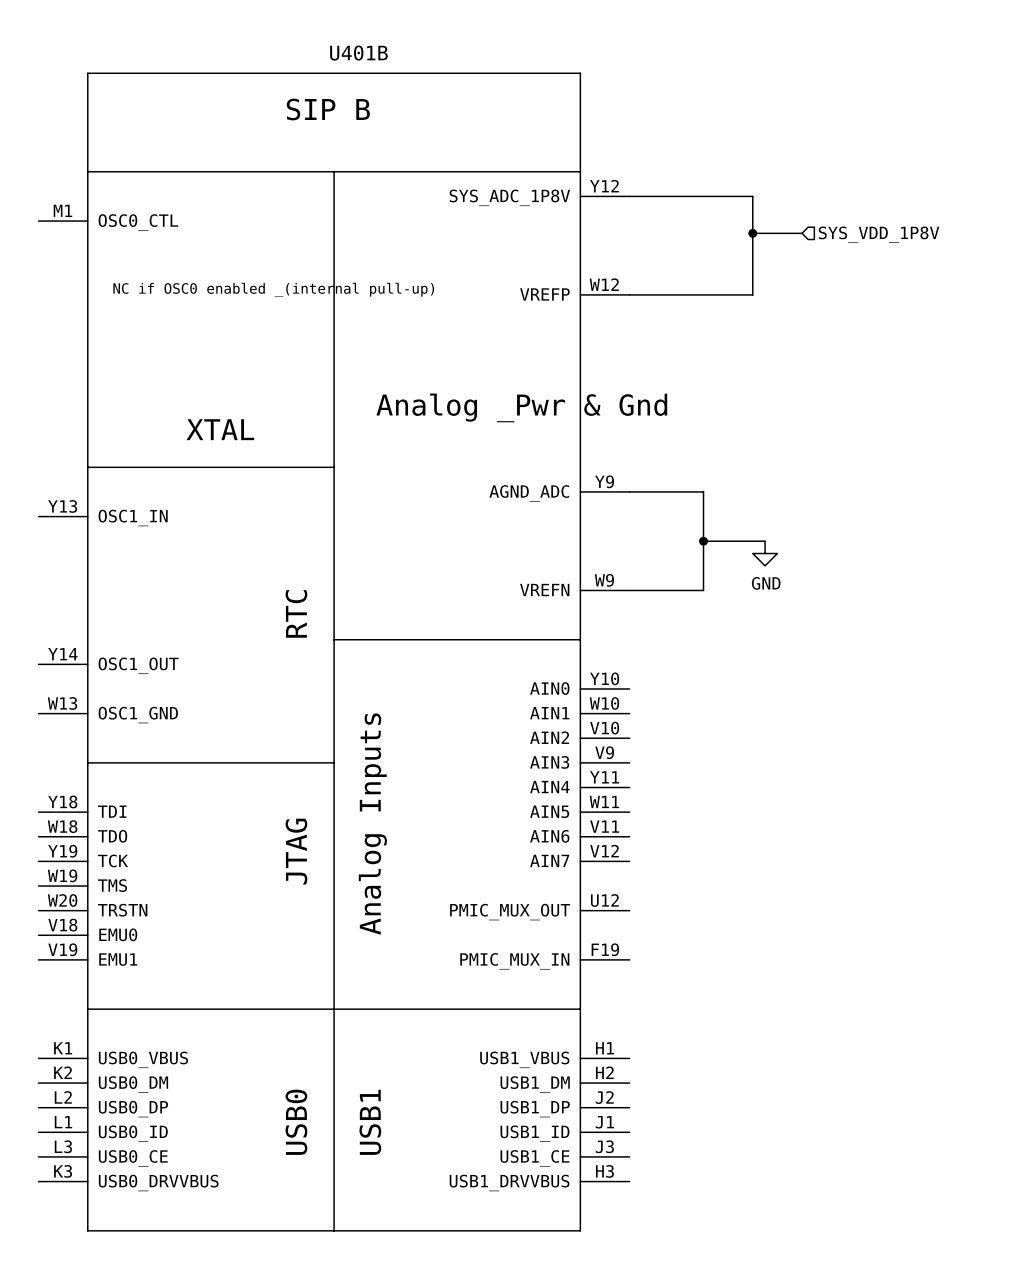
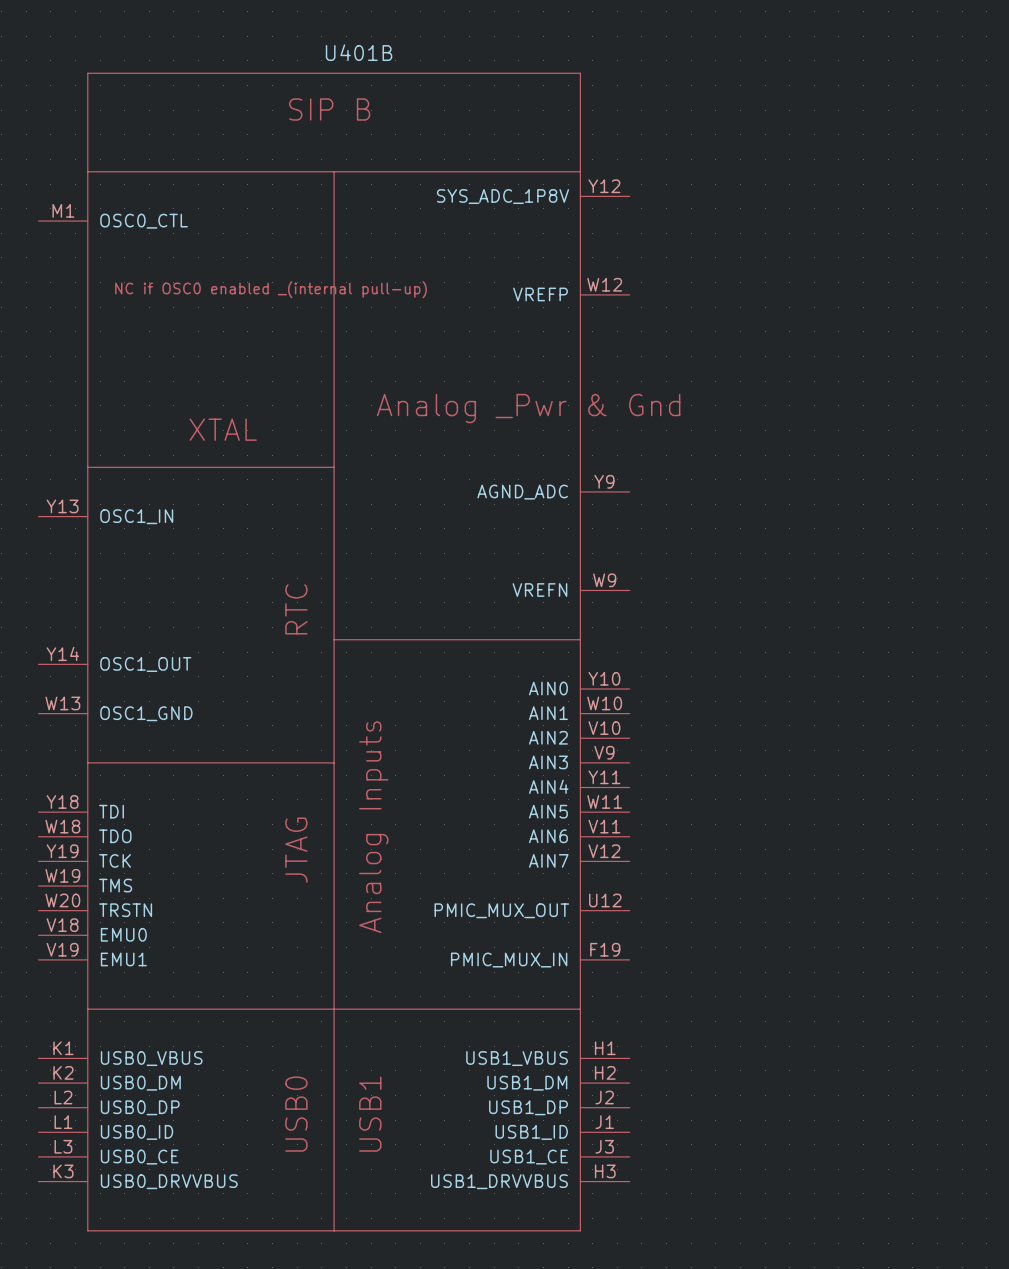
wire: (629, 196) (752, 196) (752, 294) (629, 294) -> none
wire: (752, 233) (802, 233) -> none
junction: (752, 233) -> none
hierarchical label: SYS_VDD_1P8V (879, 234) -> none
wire: (629, 491) (703, 491) (703, 590) (629, 590) -> none
wire: (703, 541) (765, 541) -> none
junction: (703, 541) -> none
power symbol: GND (765, 553) -> none

